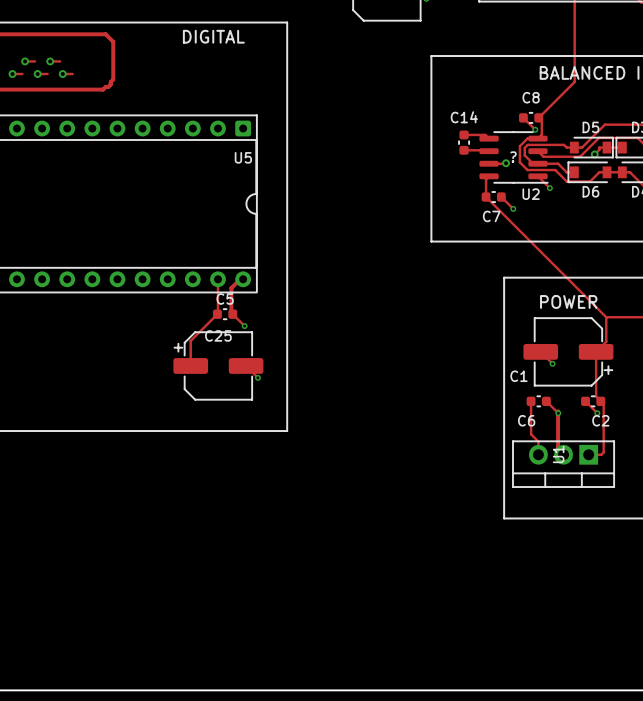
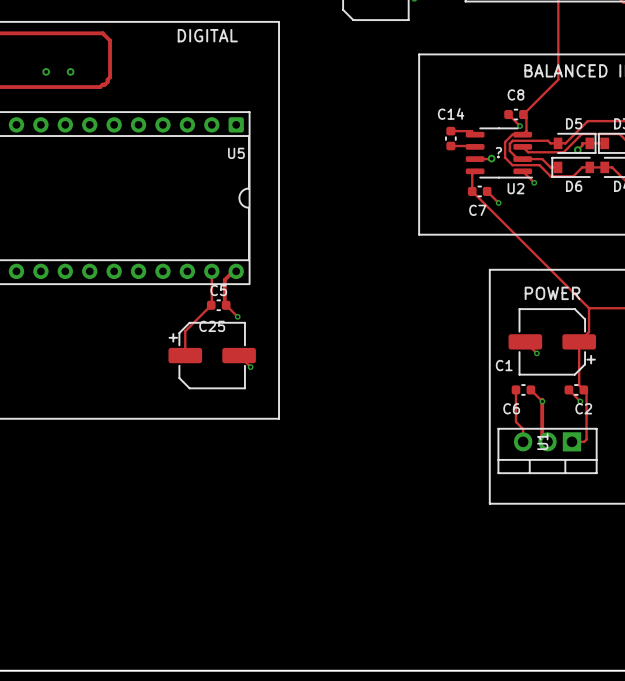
track: (25, 61) (34, 61) -> none
via: (25, 61) -> none
track: (50, 61) (60, 61) -> none
via: (50, 61) -> none
track: (12, 74) (22, 74) -> none
via: (12, 74) -> none
track: (37, 74) (47, 74) -> none
via: (37, 74) -> none
via: none -> (46, 71)
track: (62, 74) (72, 74) -> none
via: (62, 74) -> none
via: none -> (70, 71)

